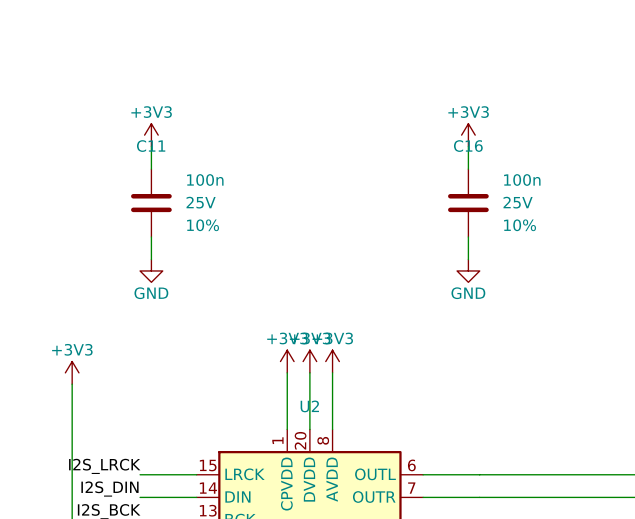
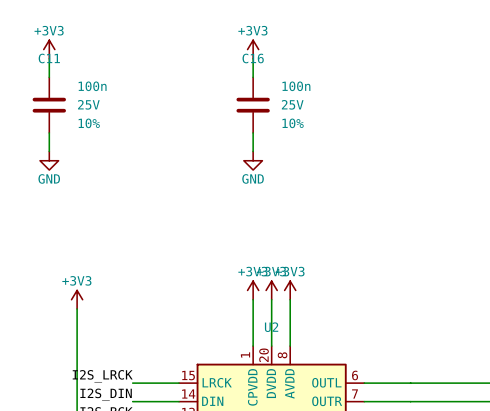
power symbol: none -> +3V3 (49, 49)
power symbol: none -> +3V3 (253, 49)
power symbol: +3V3 (151, 135) -> none
power symbol: +3V3 (468, 135) -> none
wire: (151, 146) (151, 169) -> (49, 58) (49, 77)
wire: (468, 146) (468, 169) -> (253, 58) (253, 77)
power symbol: none -> GND (49, 160)
C11 position: (151, 203) -> (49, 105)
power symbol: none -> GND (253, 160)
C16 position: (468, 203) -> (253, 105)
wire: (151, 237) (151, 259) -> (49, 132) (49, 151)
wire: (468, 237) (468, 259) -> (253, 132) (253, 151)
power symbol: GND (151, 270) -> none
power symbol: GND (468, 270) -> none

